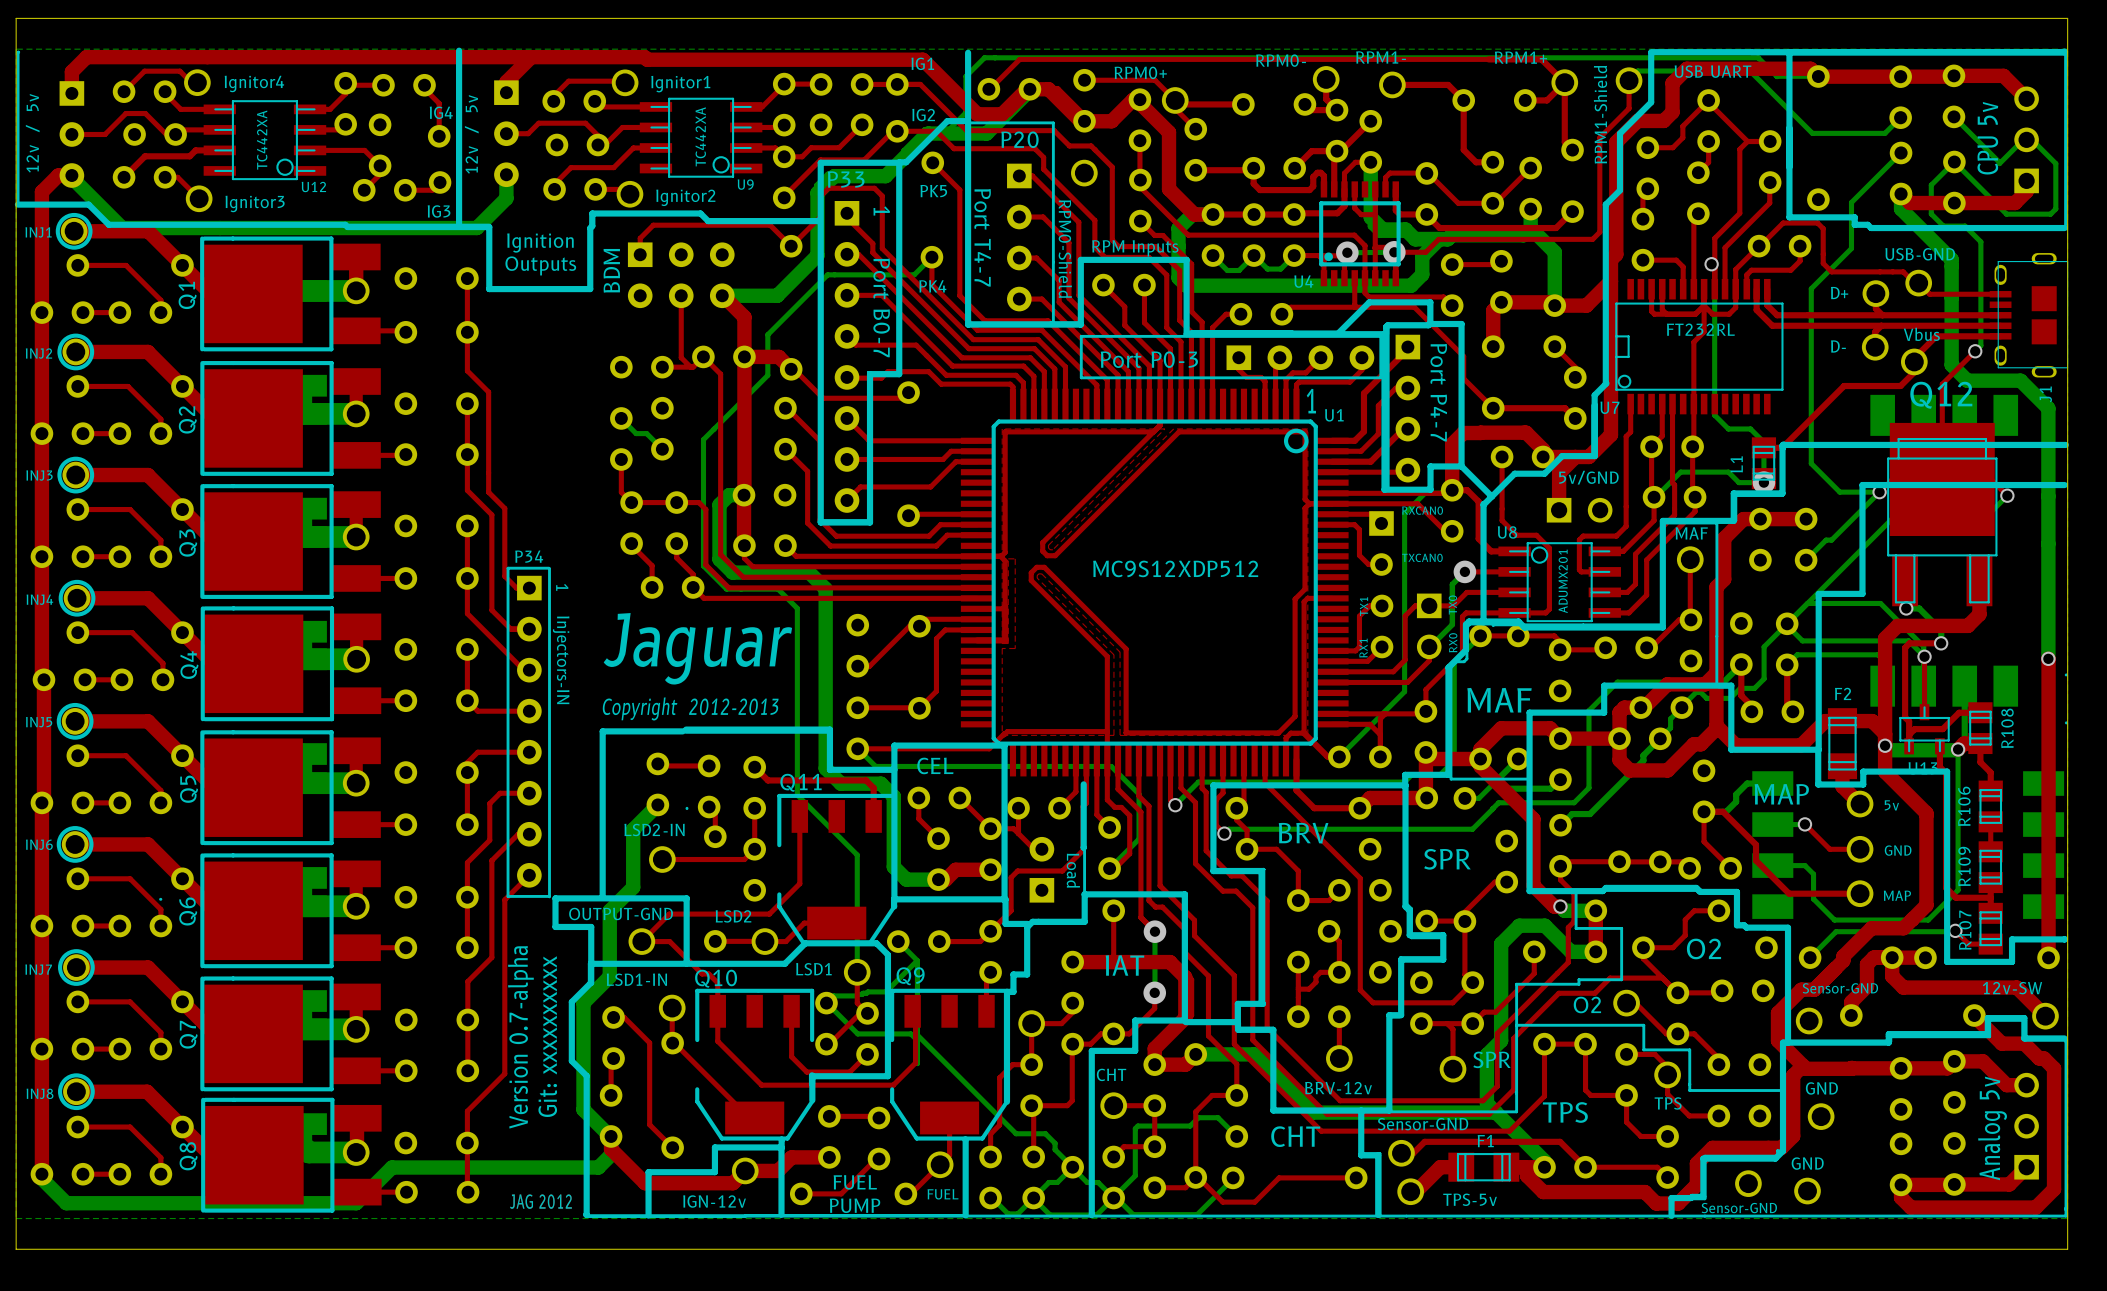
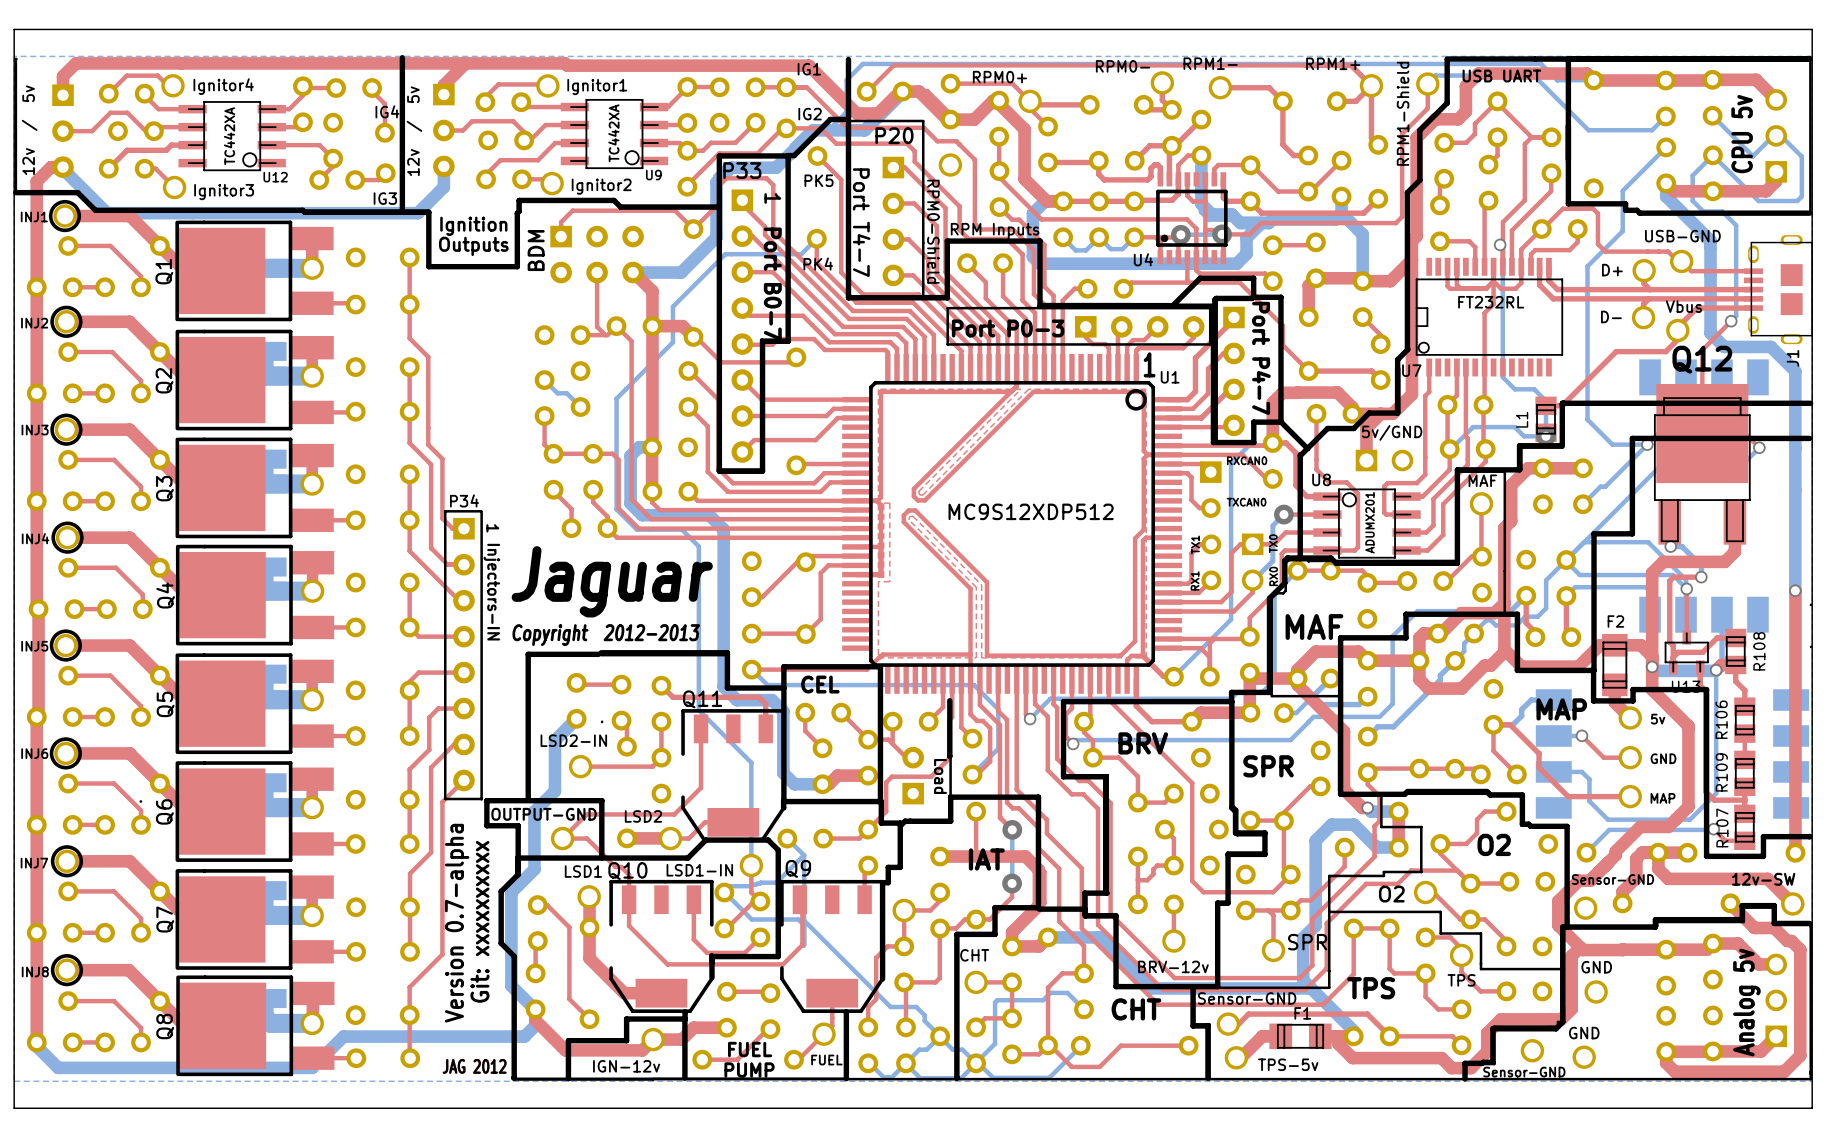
top track width: thin (715, 941) (764, 941) -> thick (626, 838) (670, 838)
text position: LSD1 (813, 969) -> LSD1 (583, 871)
text position: LSD1-IN (636, 979) -> LSD1-IN (699, 870)
top track: (672, 1008) (672, 1042) (749, 1118) -> (589, 896) (589, 958) (624, 993) (656, 993)

